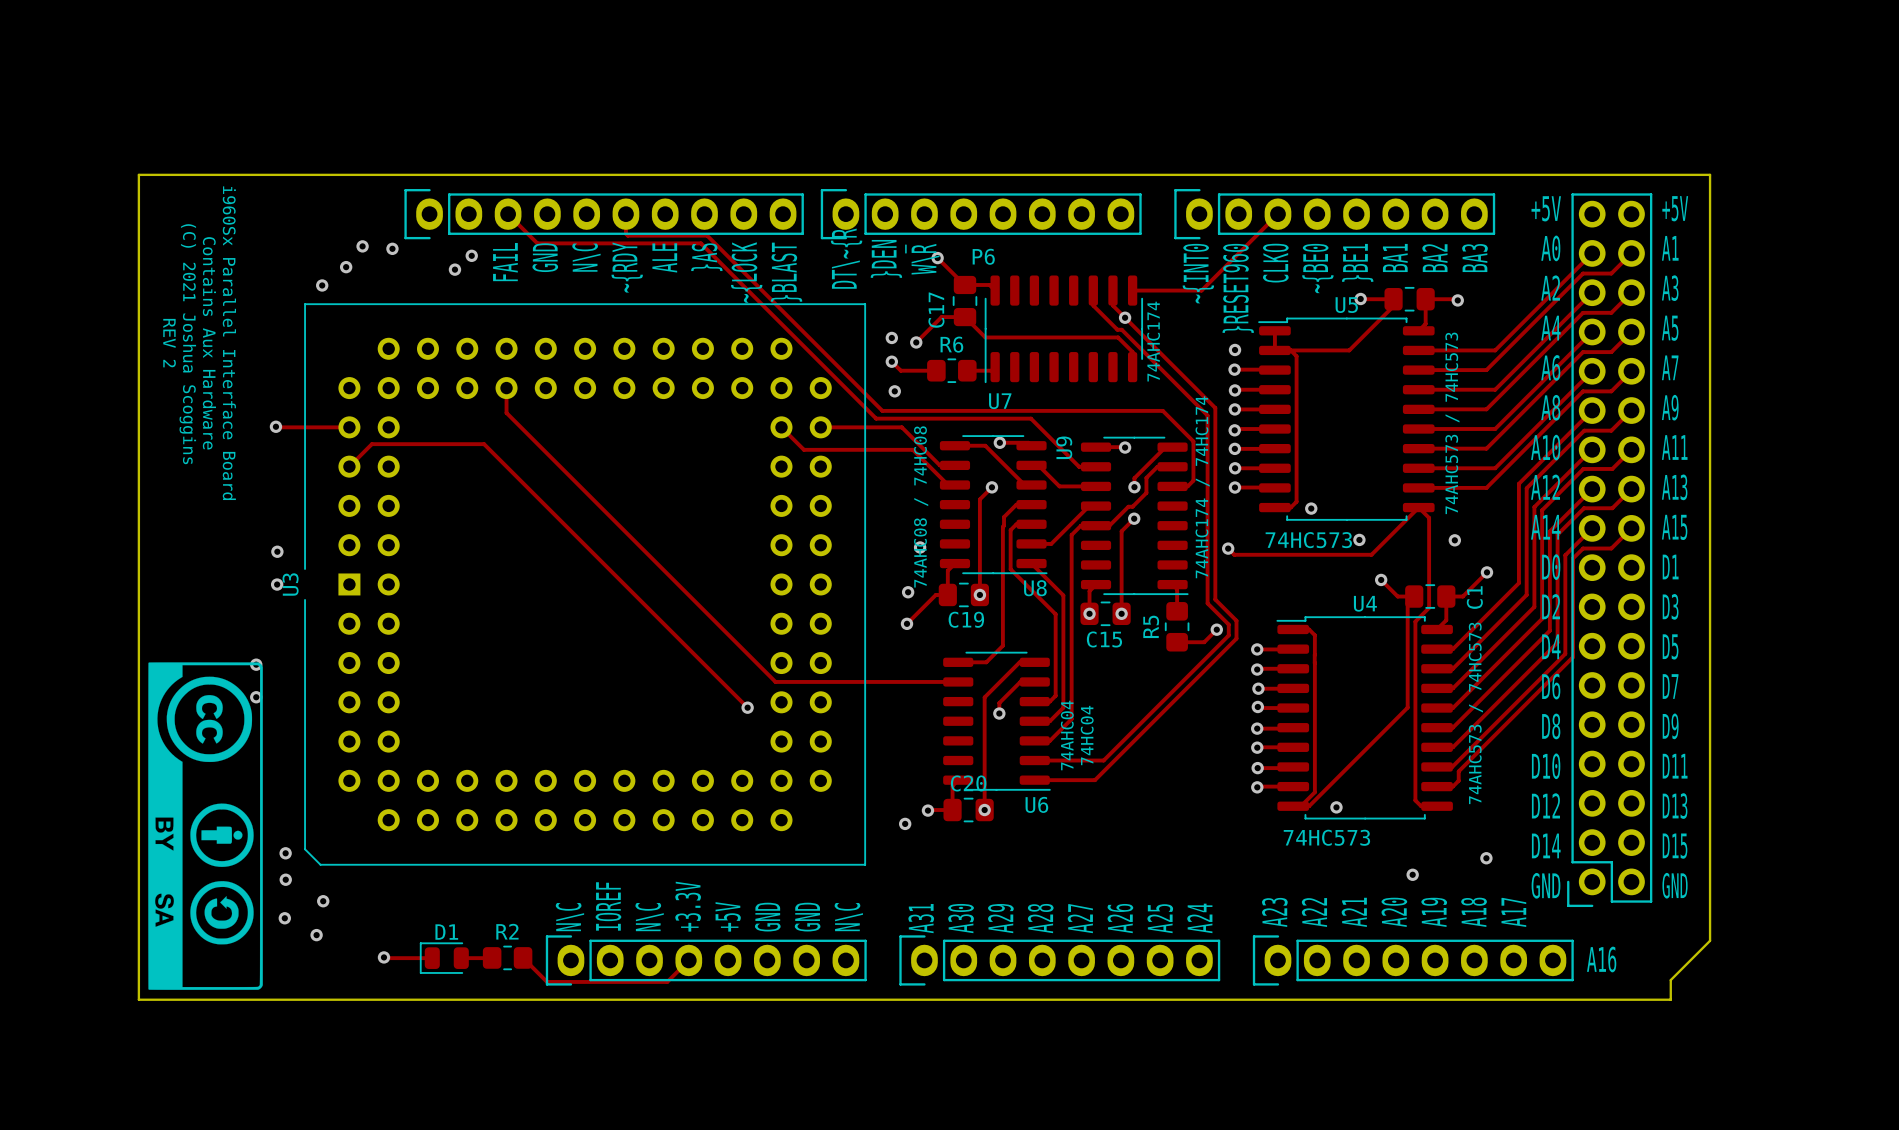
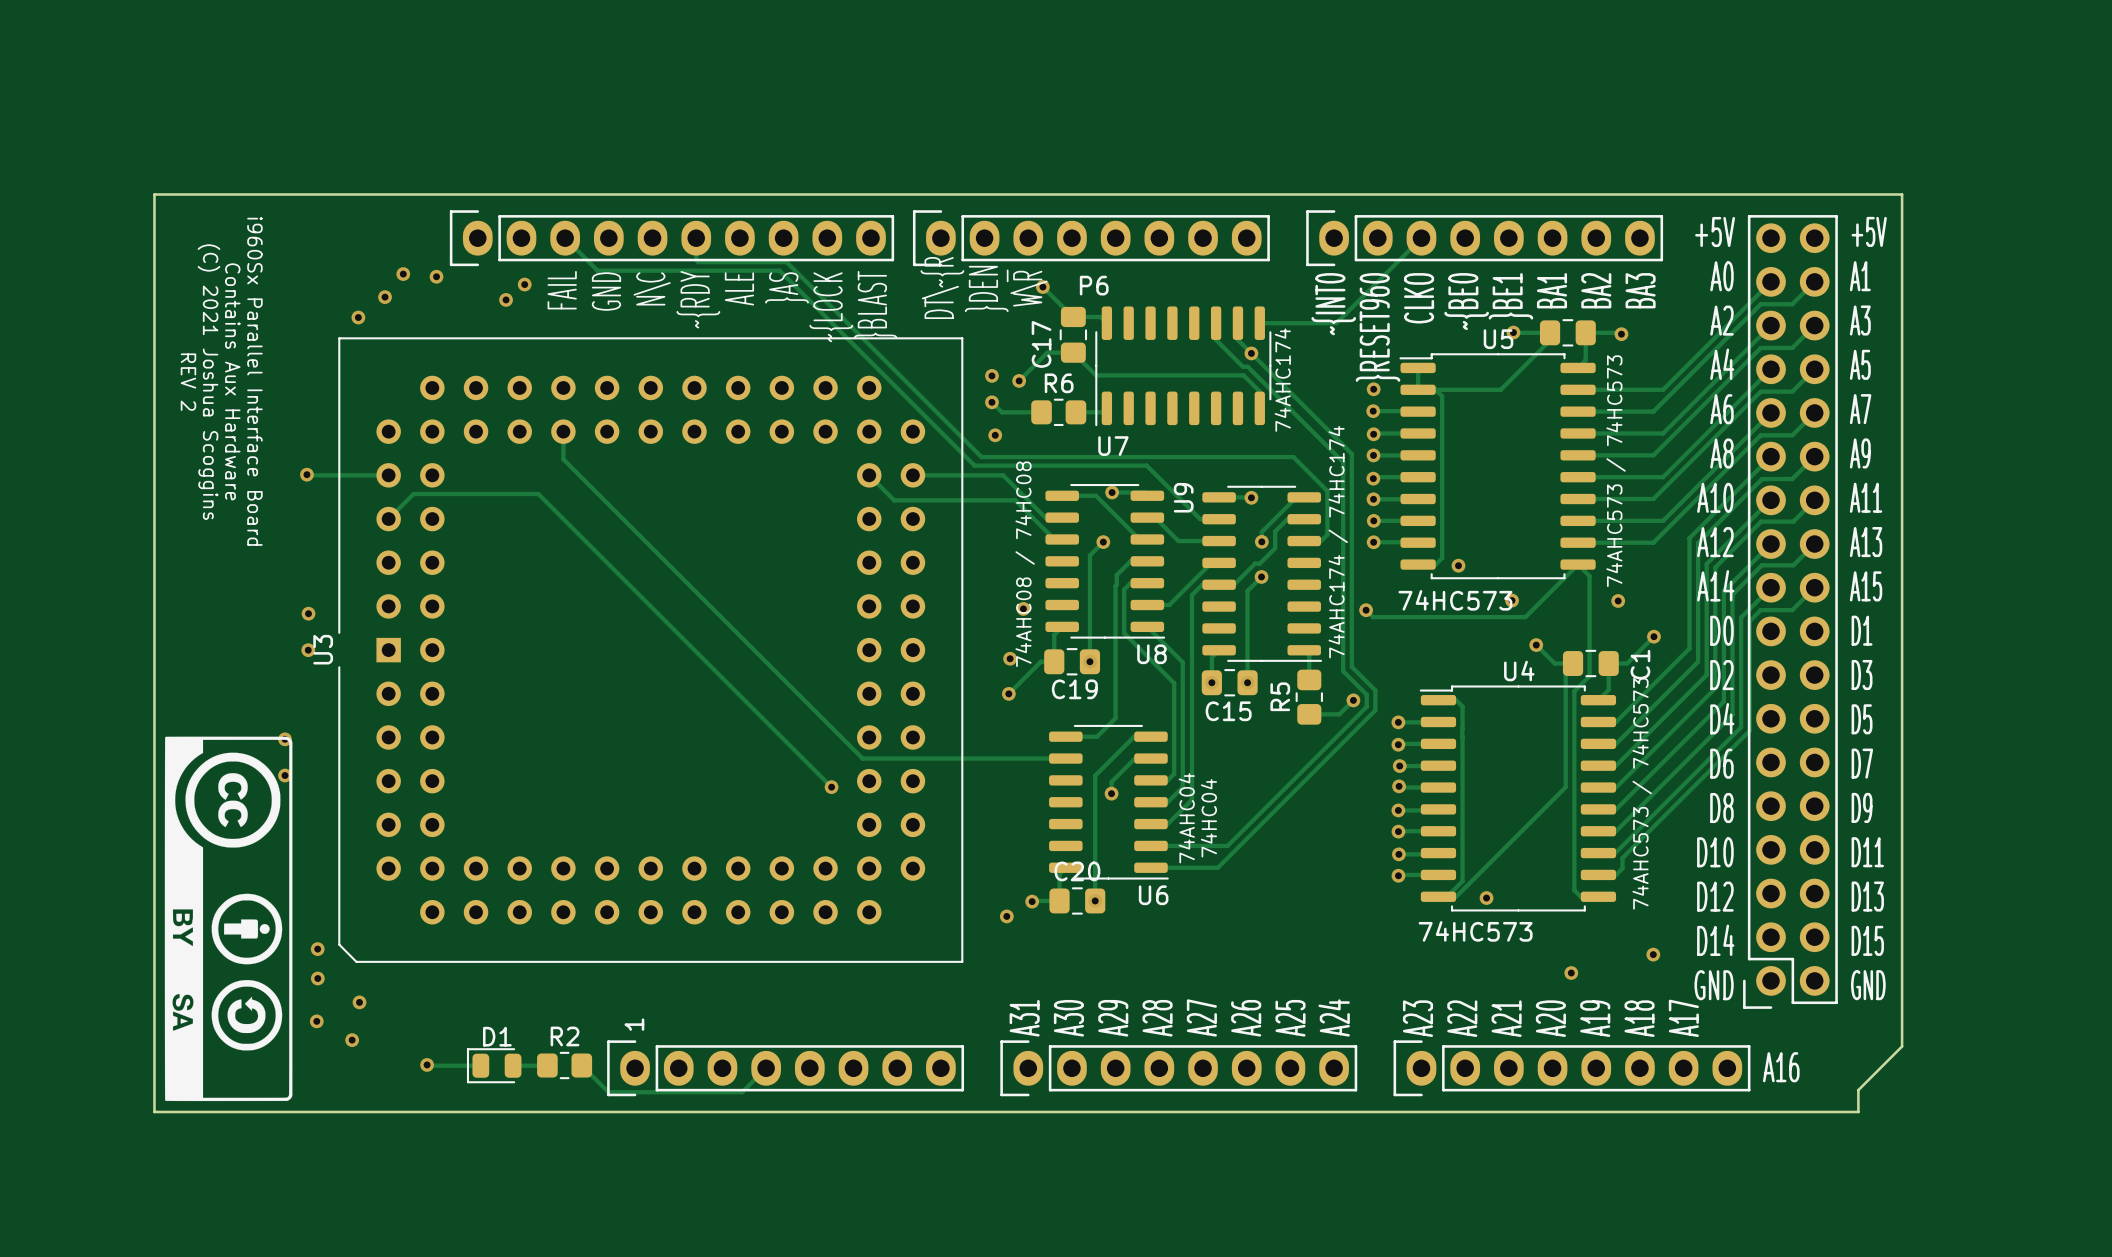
text: IOREF (608, 906) -> none
text: +3.3V (688, 906) -> none
text: +5V (728, 916) -> none
text: N\C (569, 917) -> 1 (634, 1024)
text: N\C (649, 917) -> none
text: GND (767, 917) -> none
text: GND (807, 917) -> none
text: N\C (848, 917) -> none

